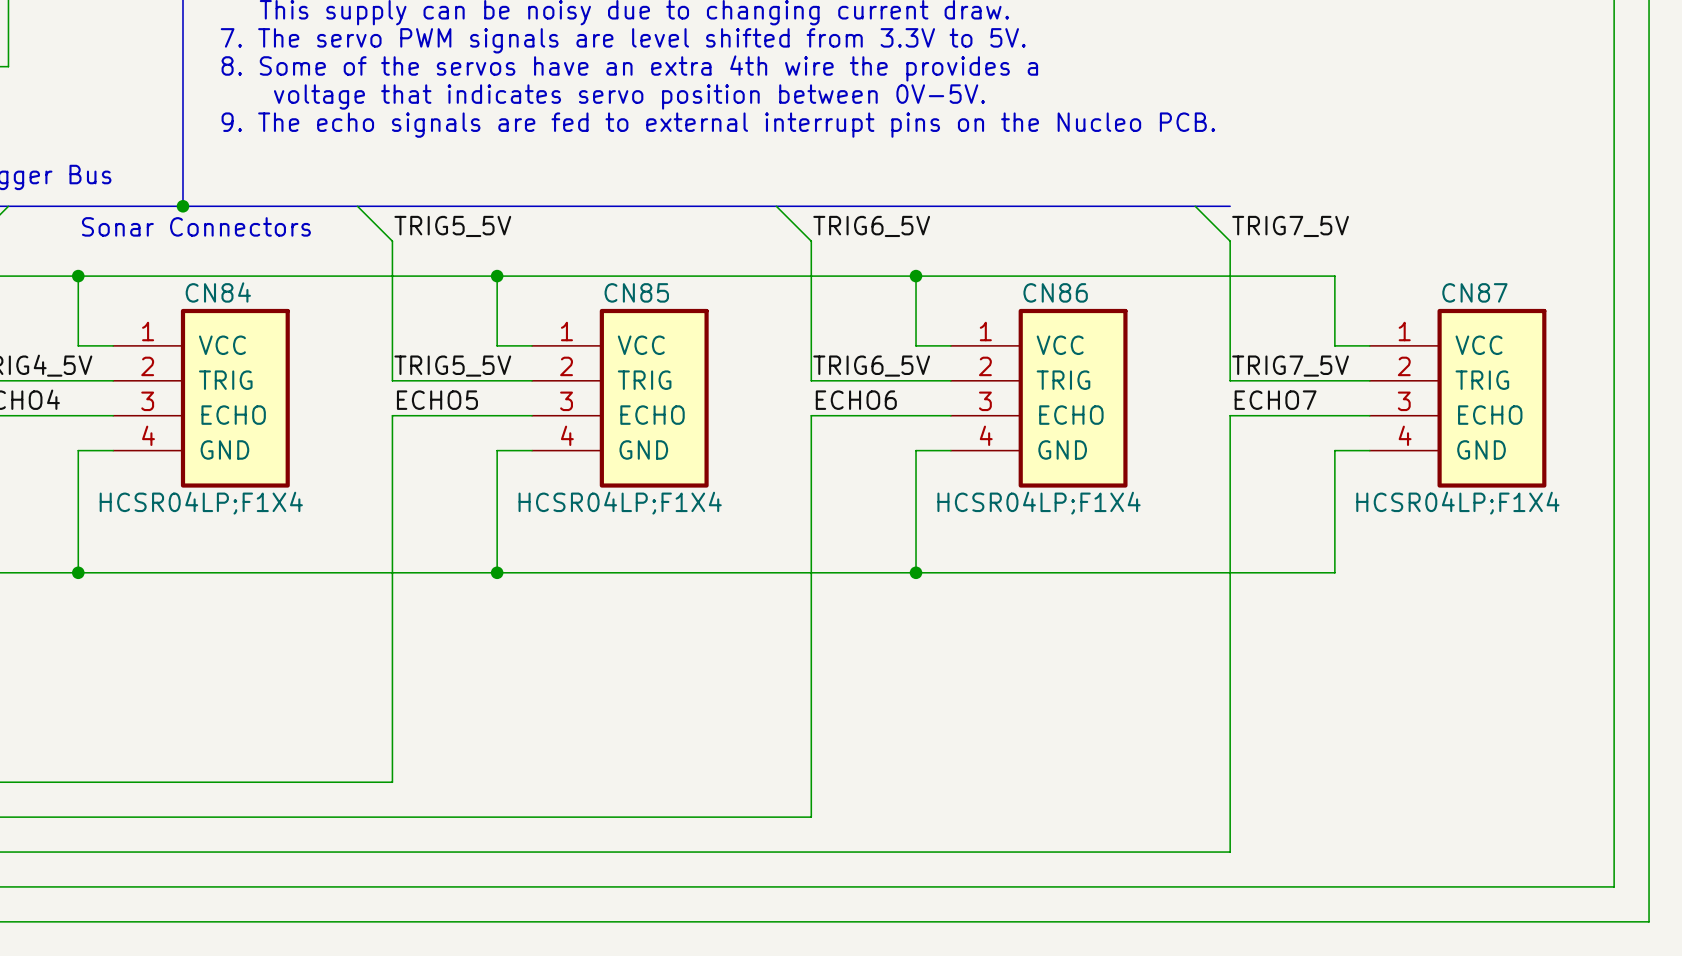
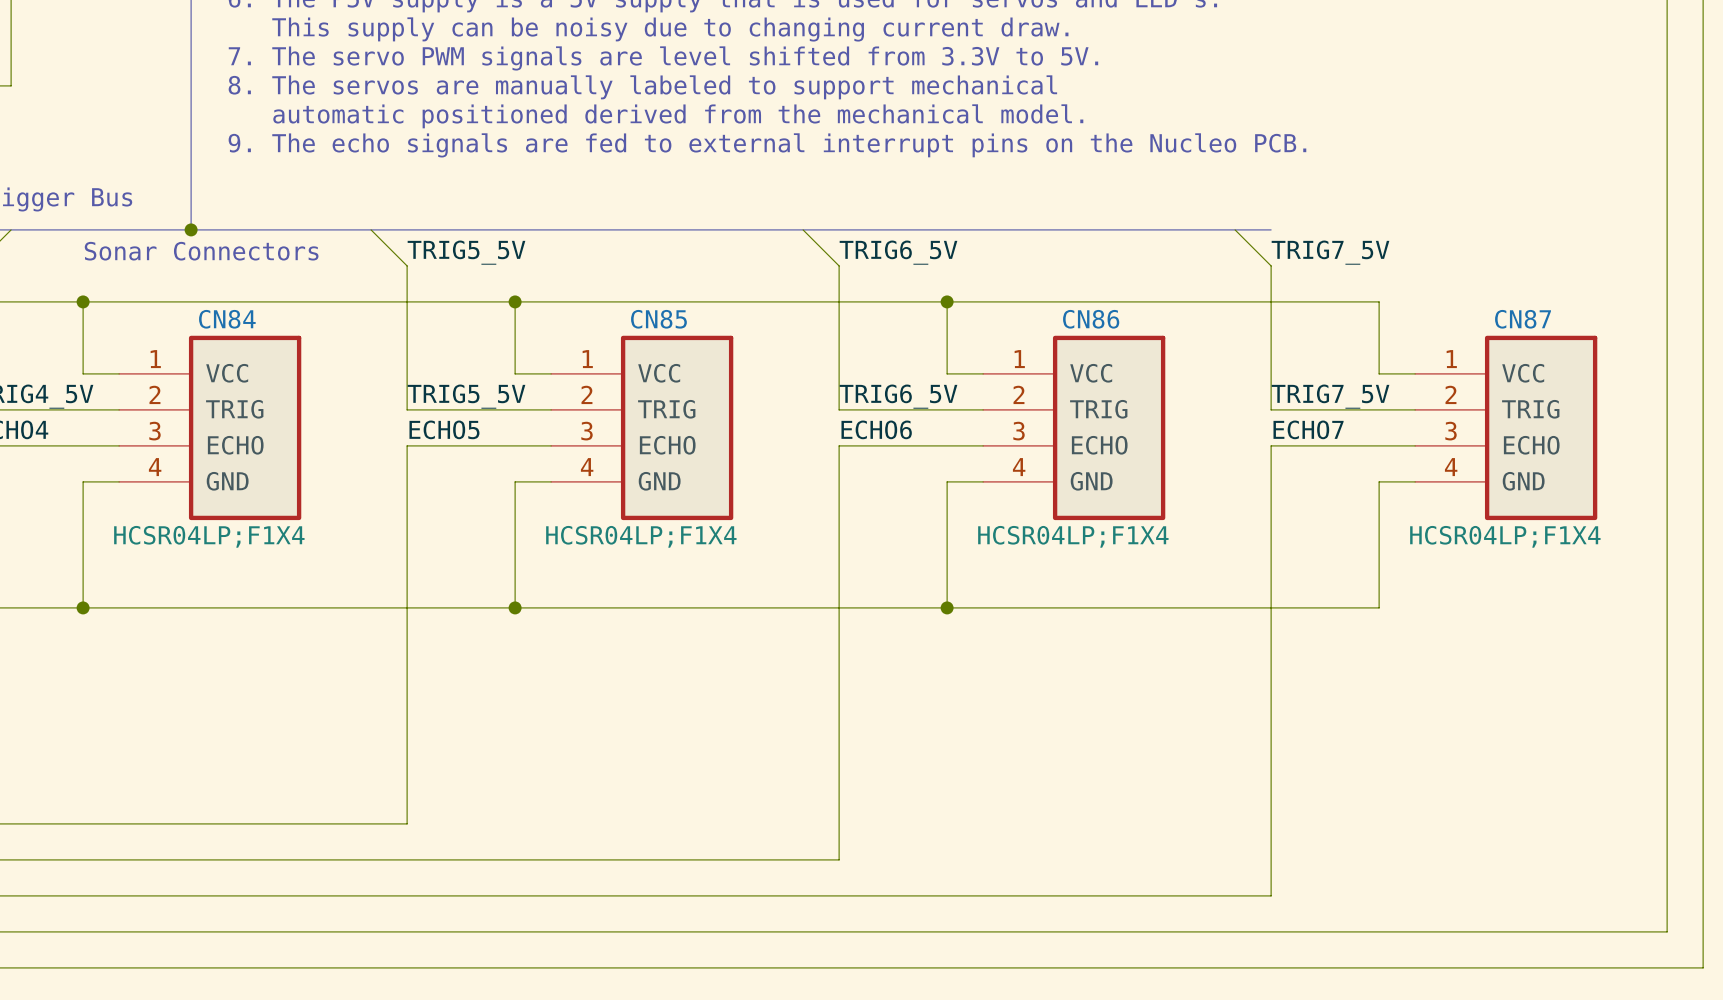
text: 8. Some of the servos have an extra 4th wire the provides a (629, 68) -> 8. The servos are manually labeled to support mechanical (642, 87)
text: voltage that indicates servo position between 0V-5V. (629, 96) -> automatic positioned derived from the mechanical model. (678, 116)

